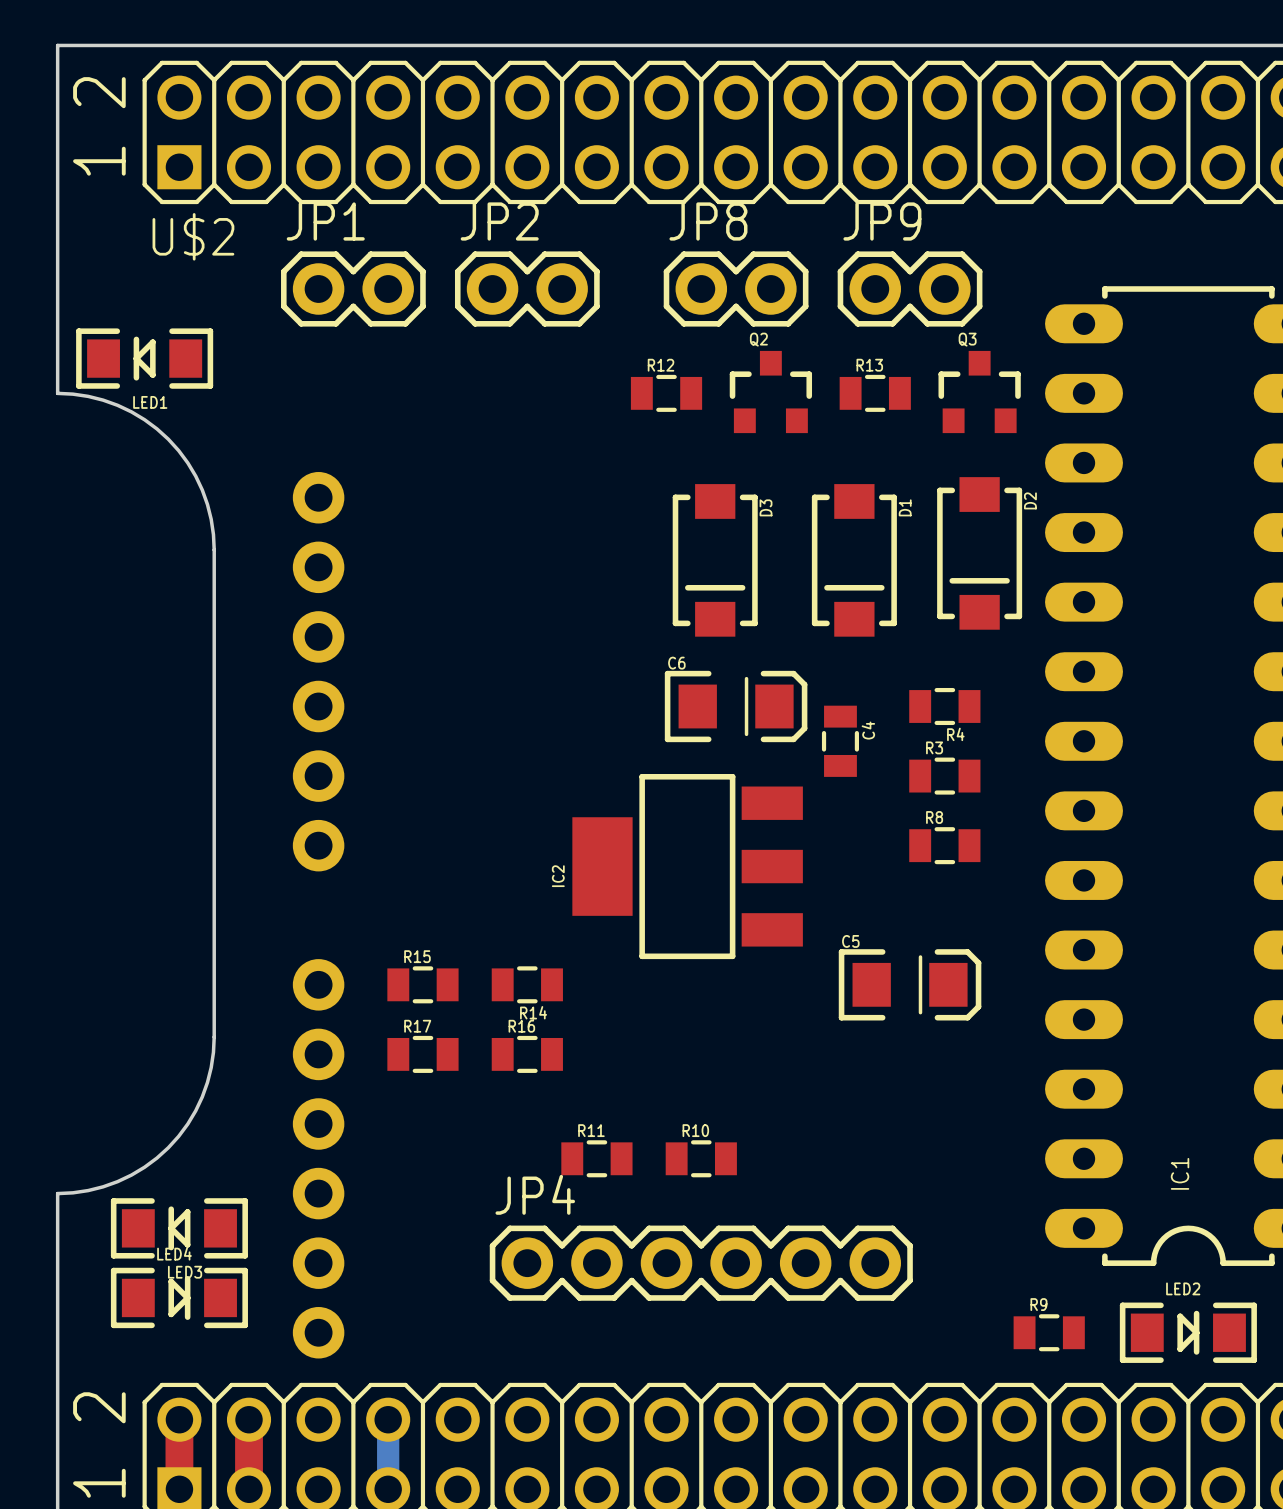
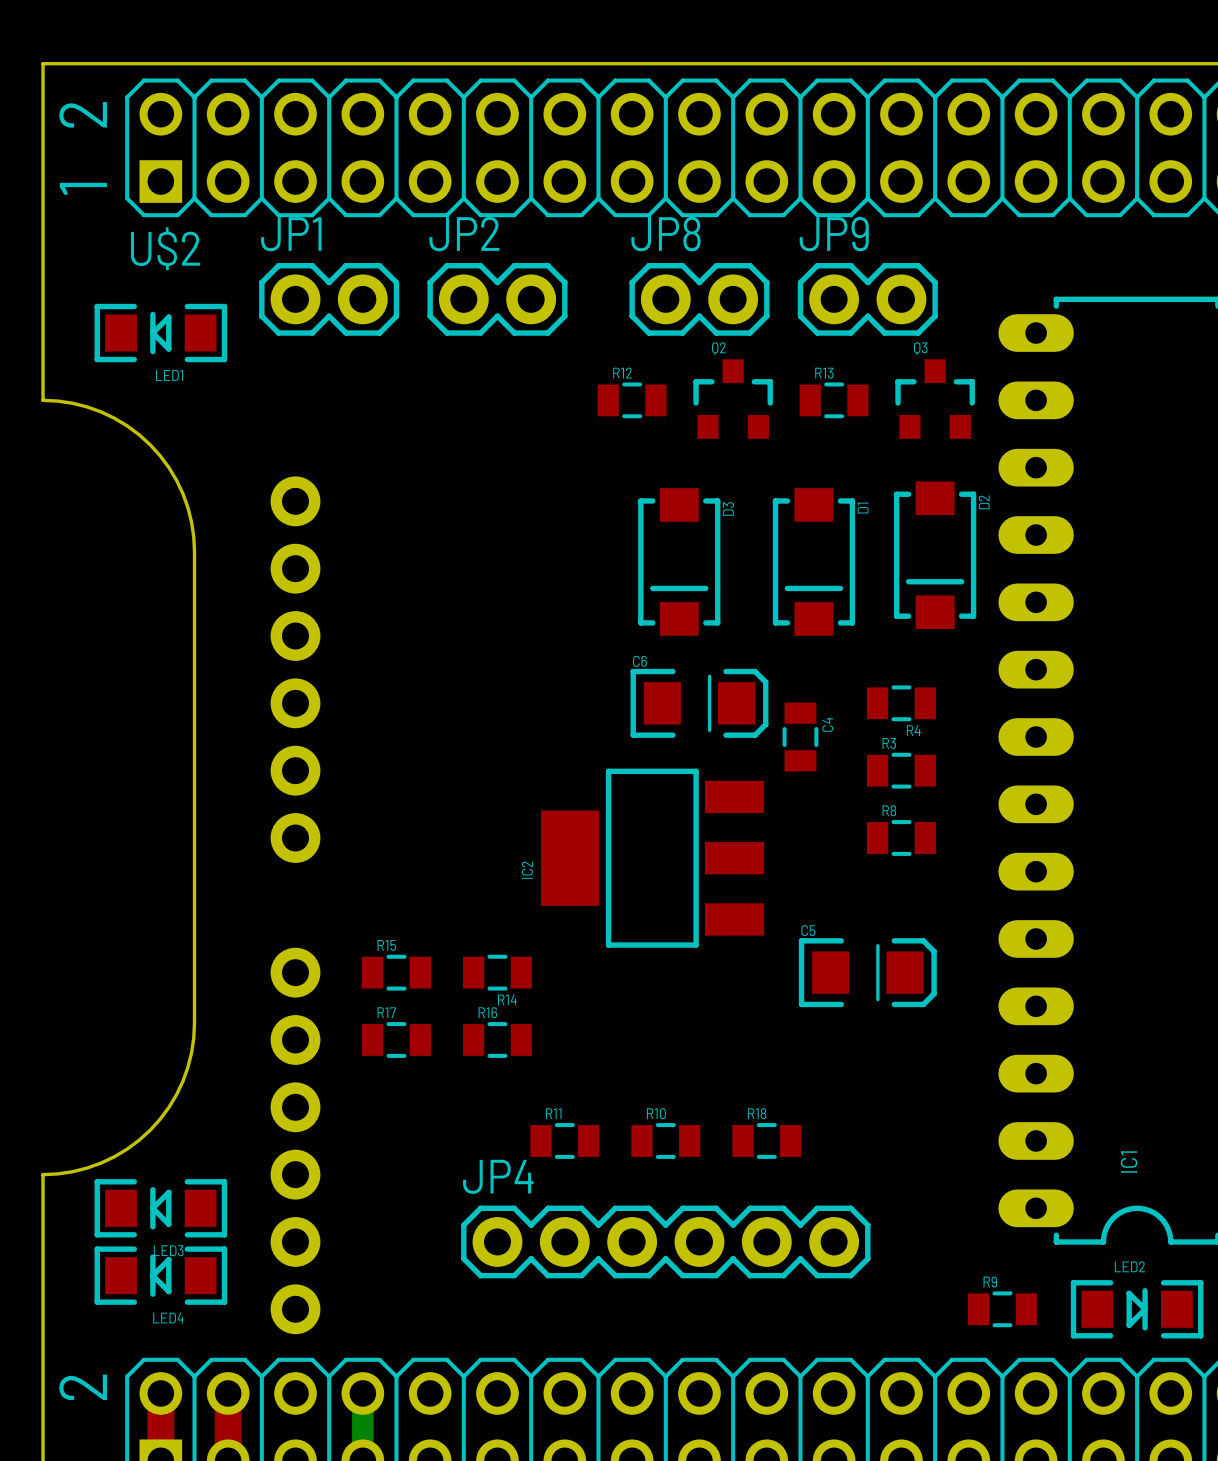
LED1 position: (144, 358) -> (160, 333)
R18: none -> (766, 1140)
LED4 rotation: 0° (179, 1297) -> 180° (160, 1275)

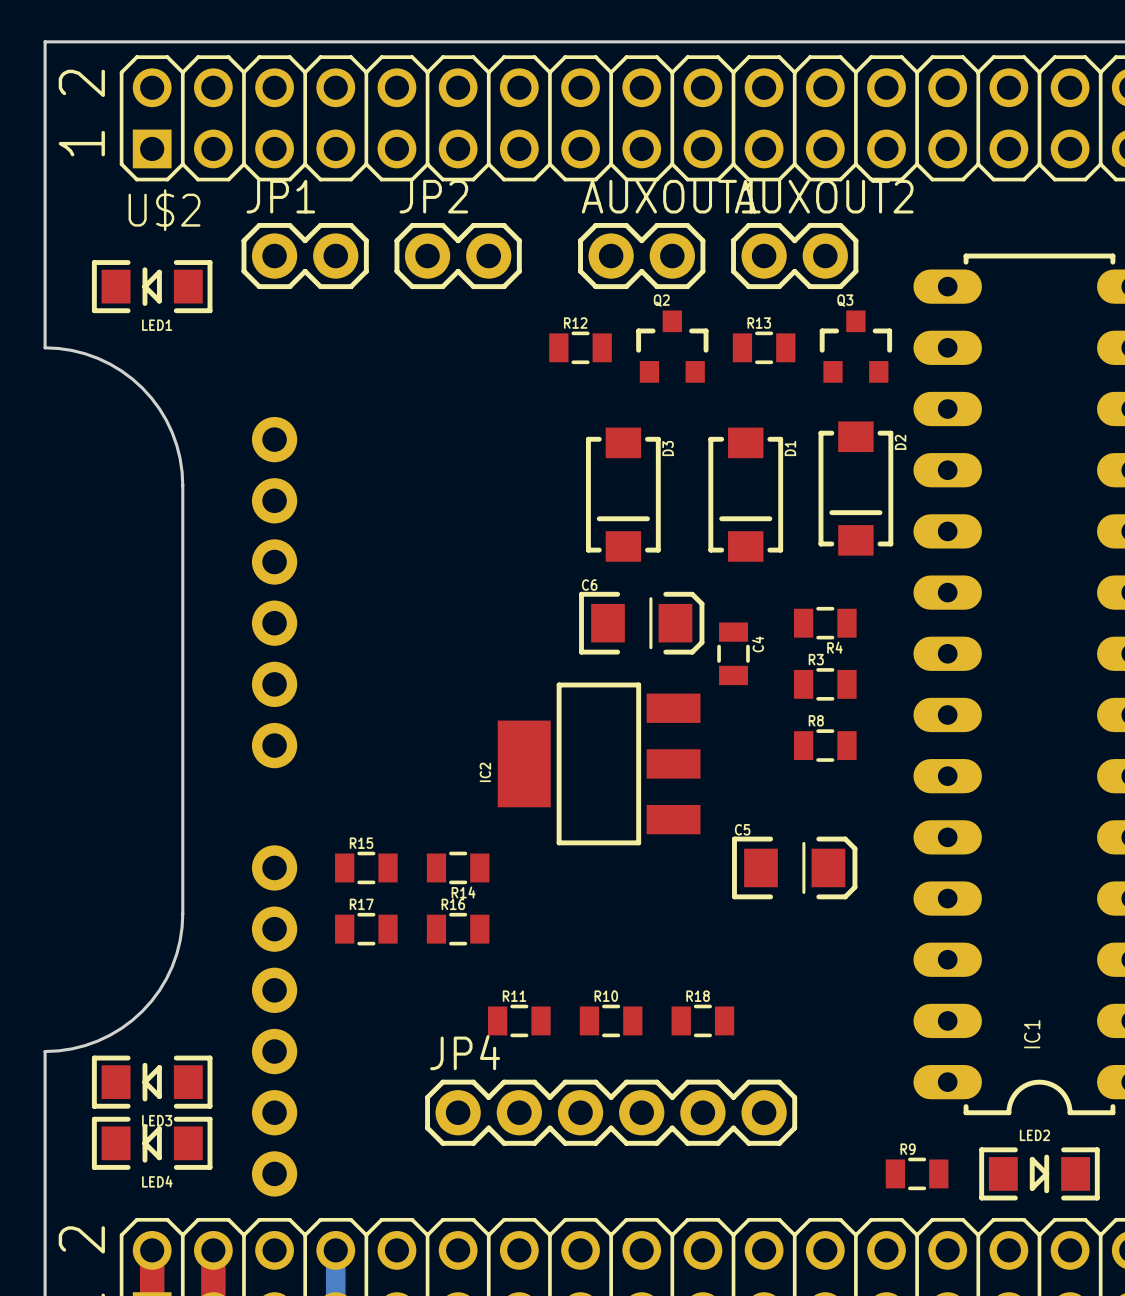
JP8 name: JP8 (666, 234) -> AUXOUT1 (671, 196)
JP9 name: JP9 (834, 234) -> AUXOUT2 (824, 196)

